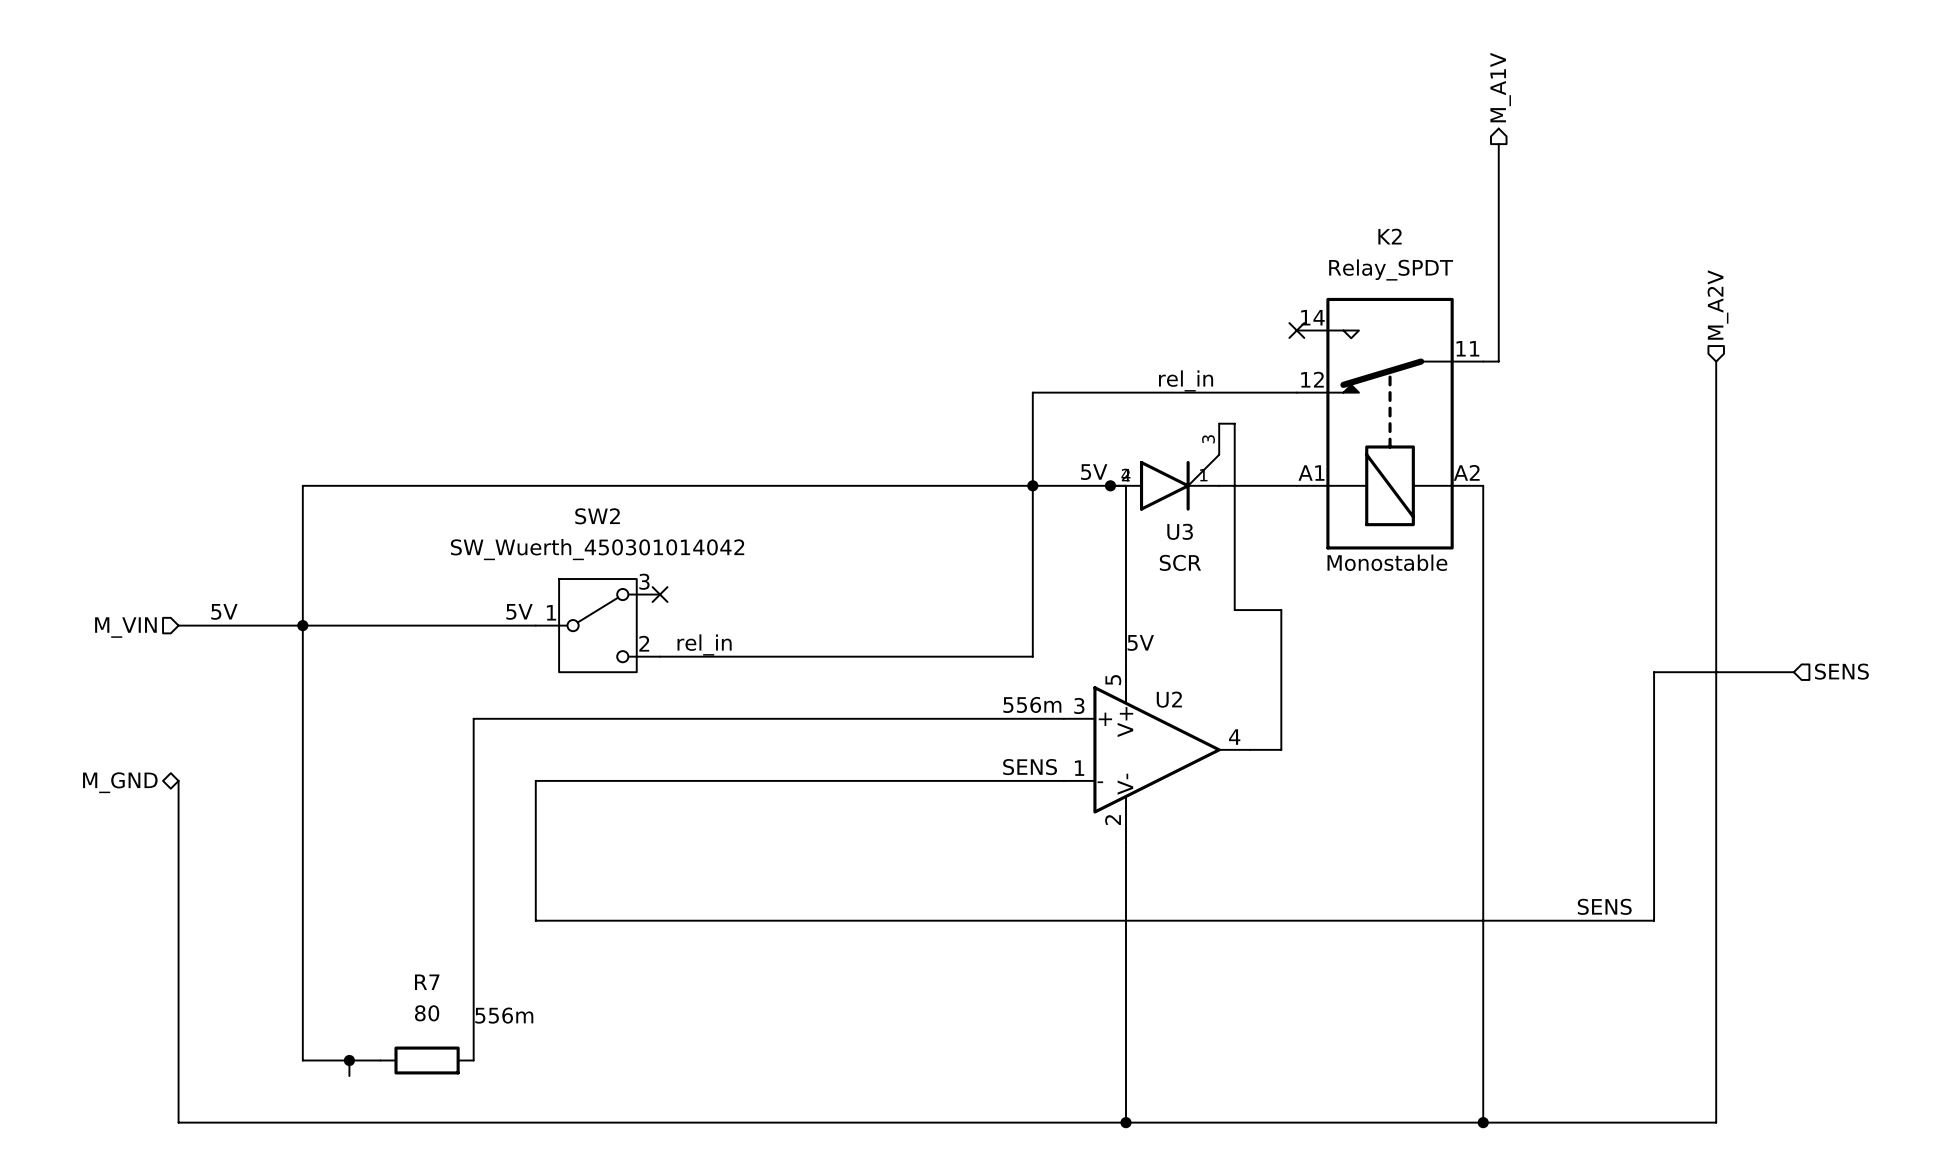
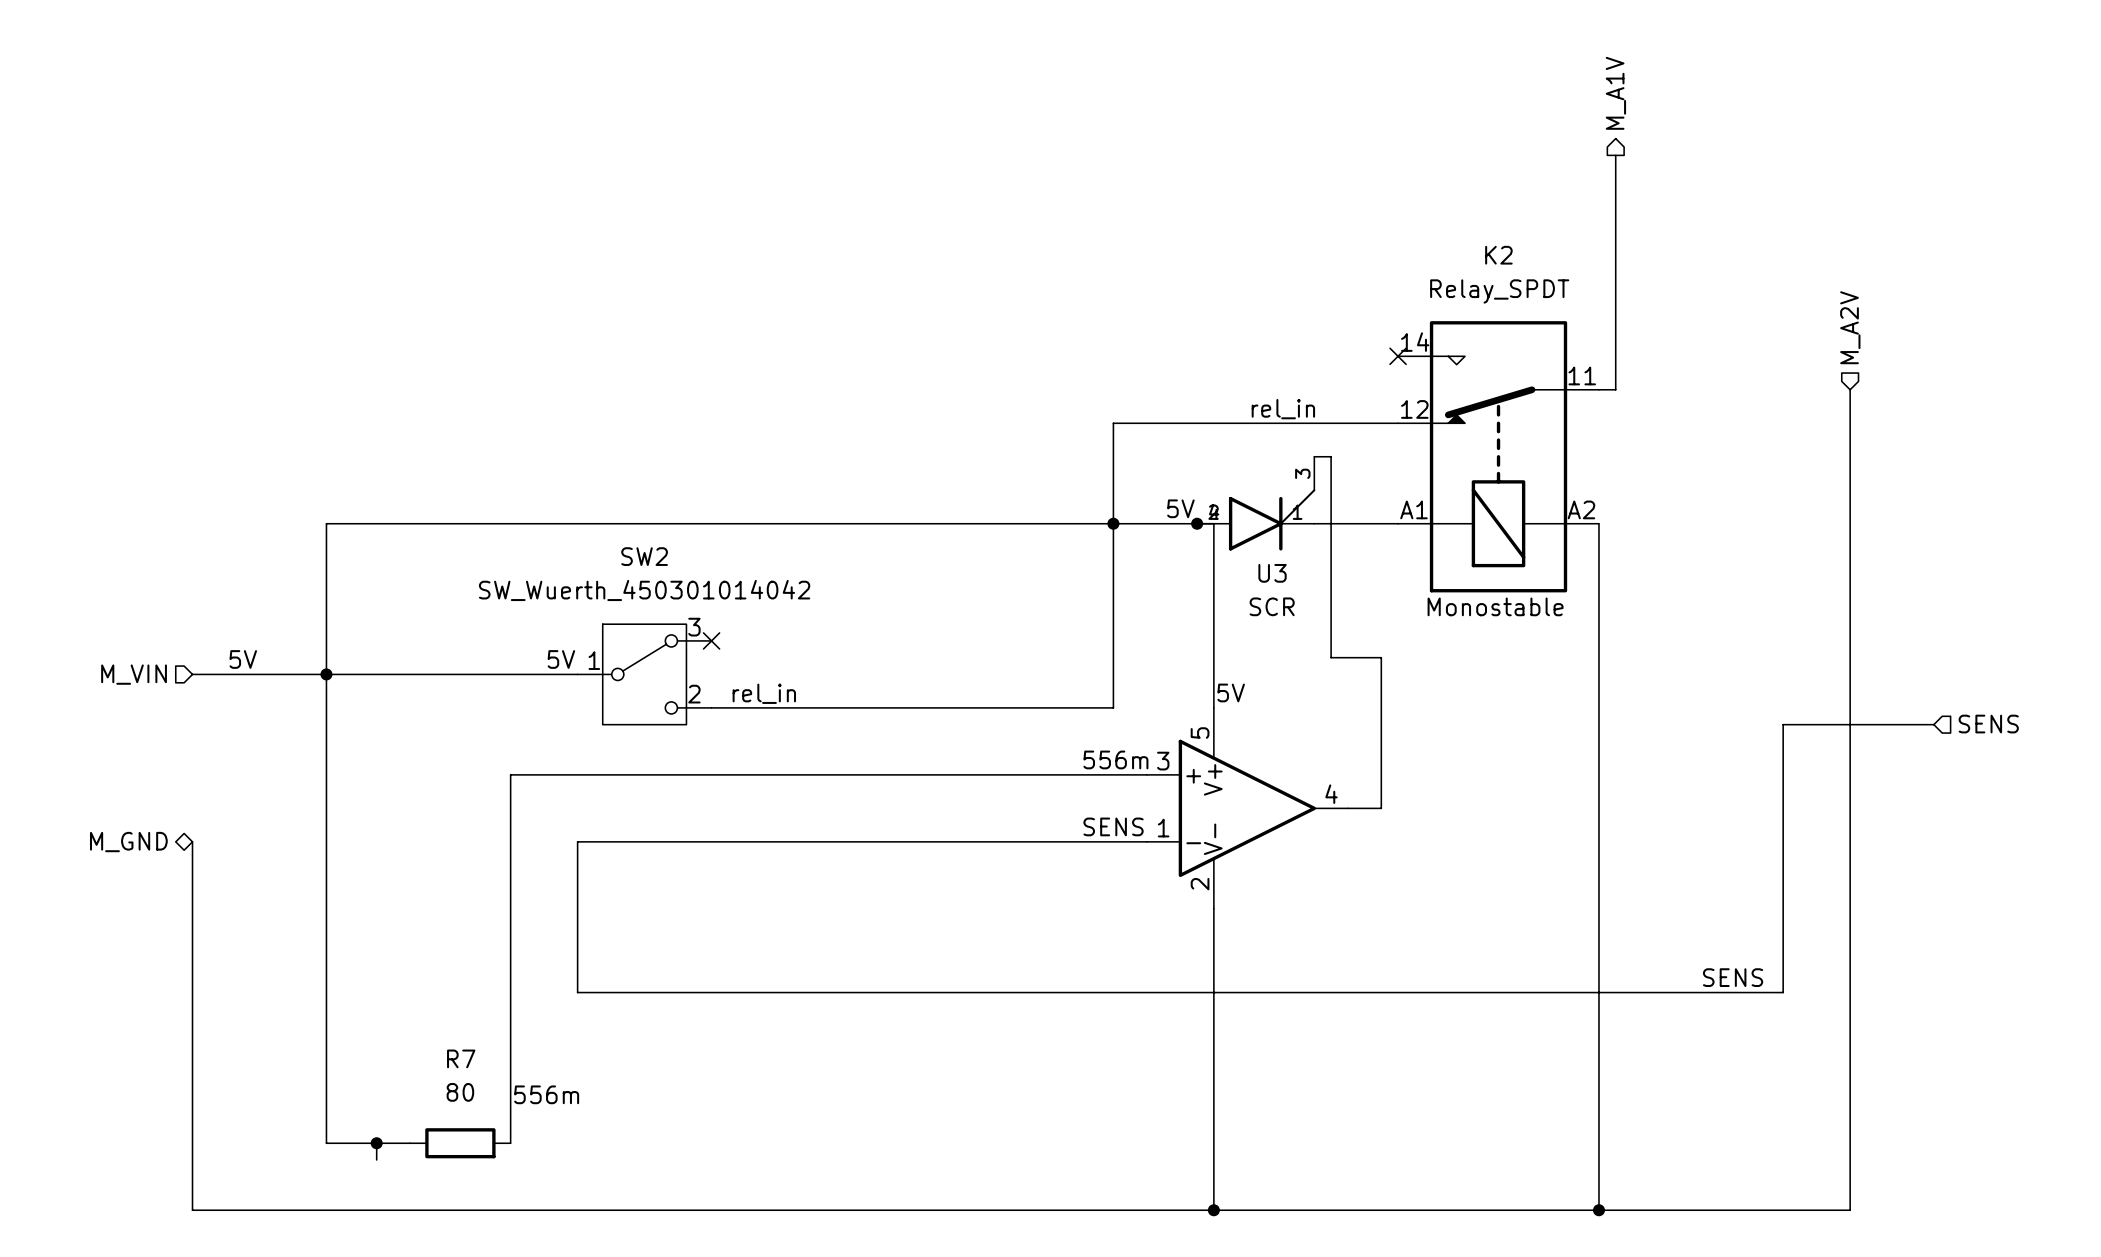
text: U2 (1169, 699) -> none

